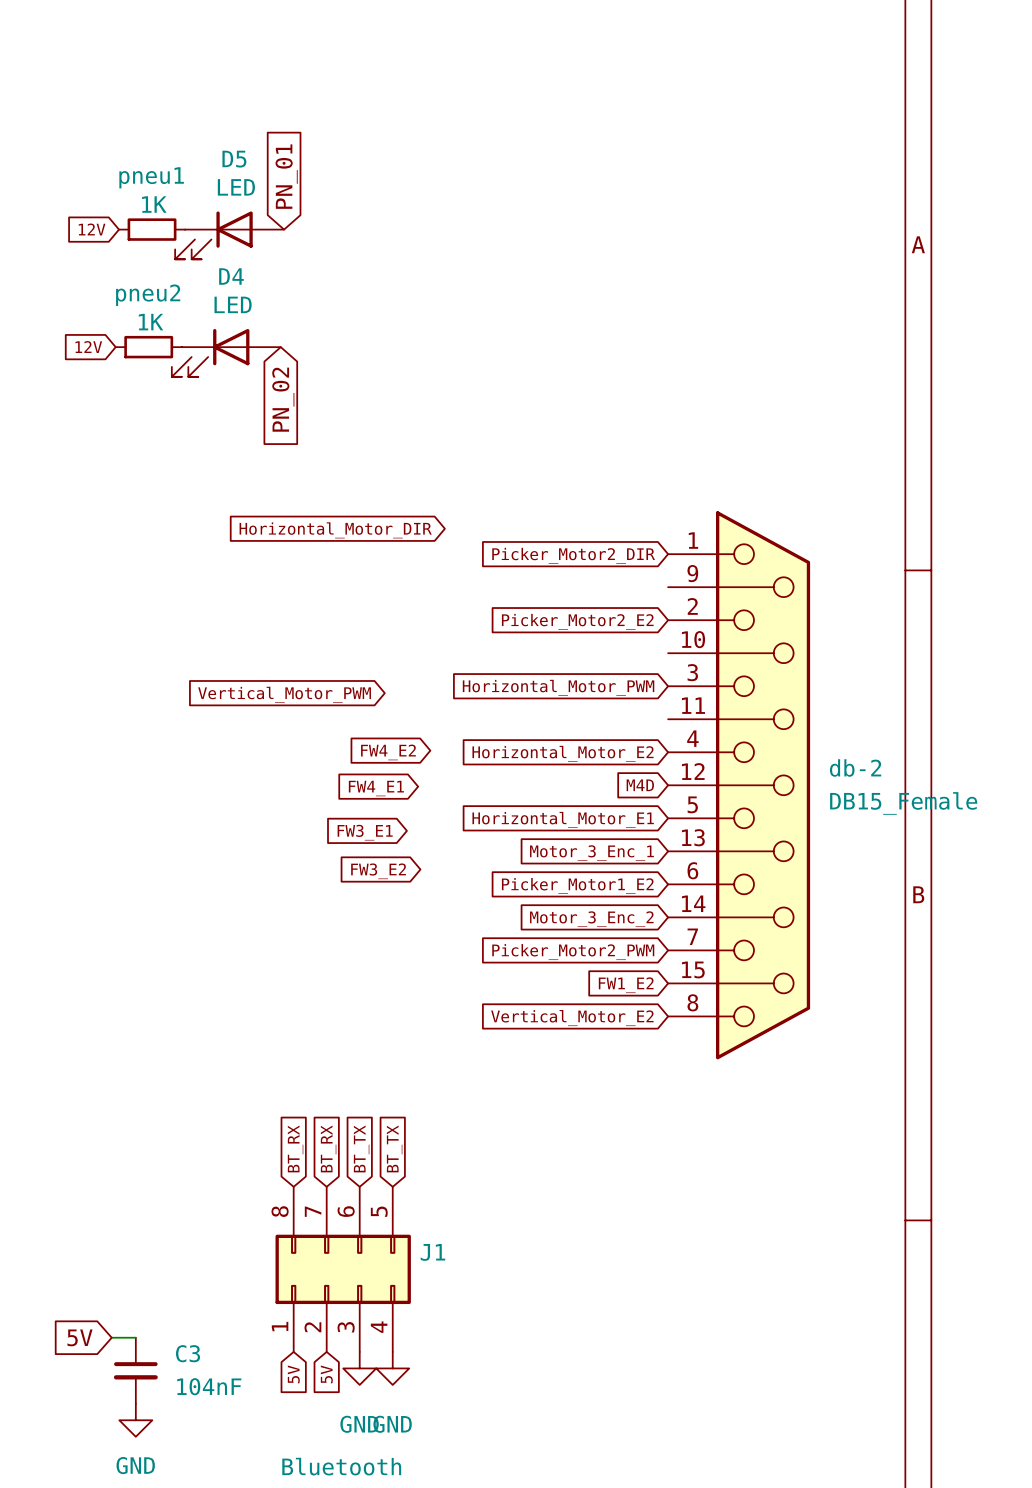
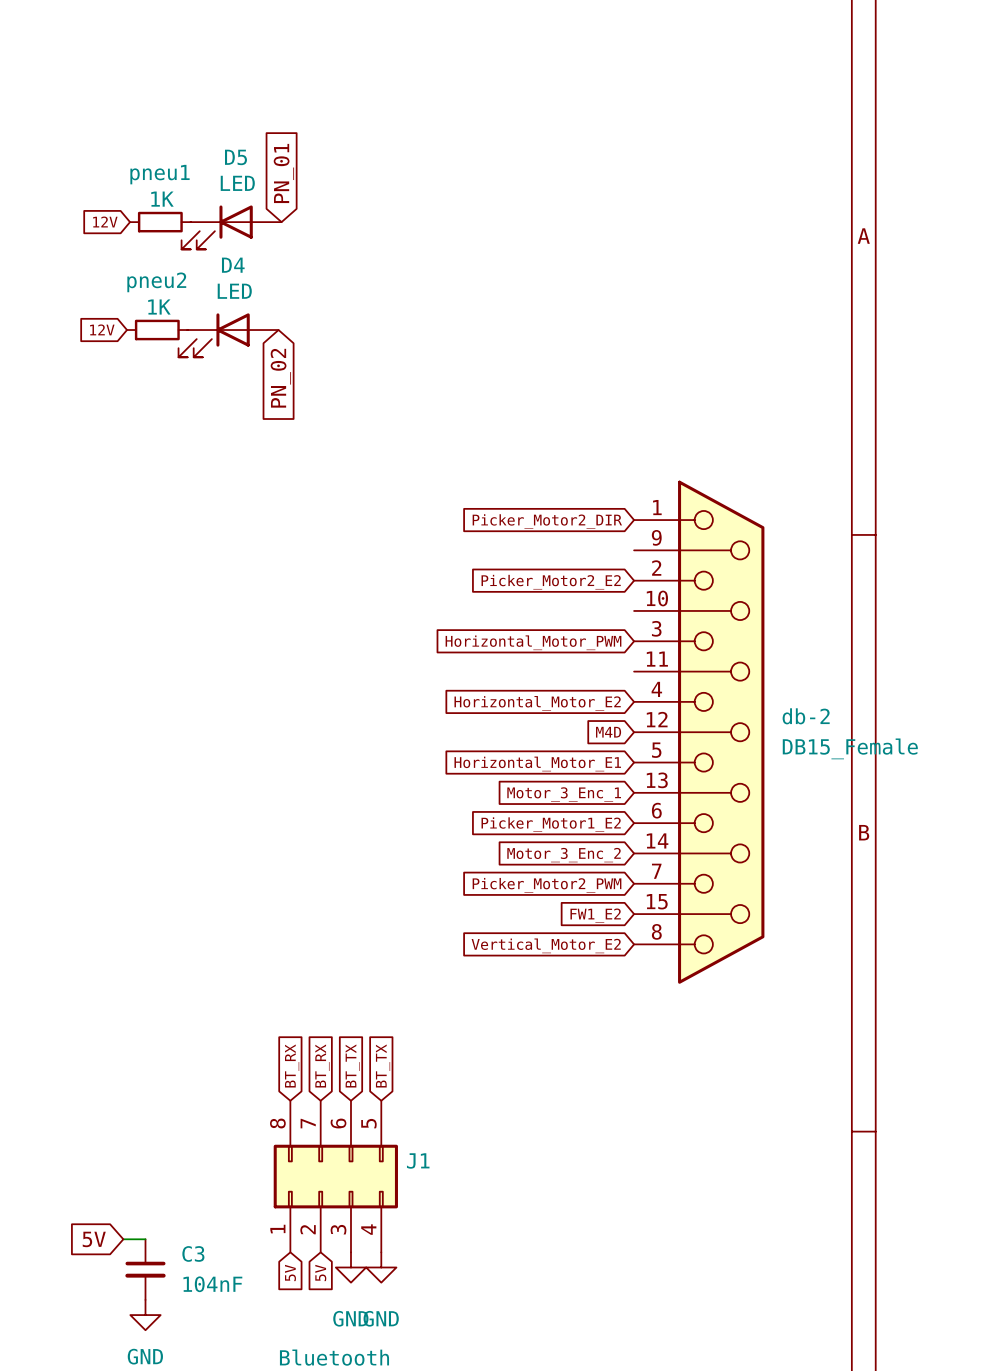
global label: Horizontal_Motor_DIR (335, 530) -> none
global label: Vertical_Motor_PWM (284, 694) -> none
global label: FW4_E2 (388, 752) -> none
global label: FW4_E1 (376, 788) -> none
global label: FW3_E1 (365, 832) -> none
global label: FW3_E2 (378, 871) -> none

